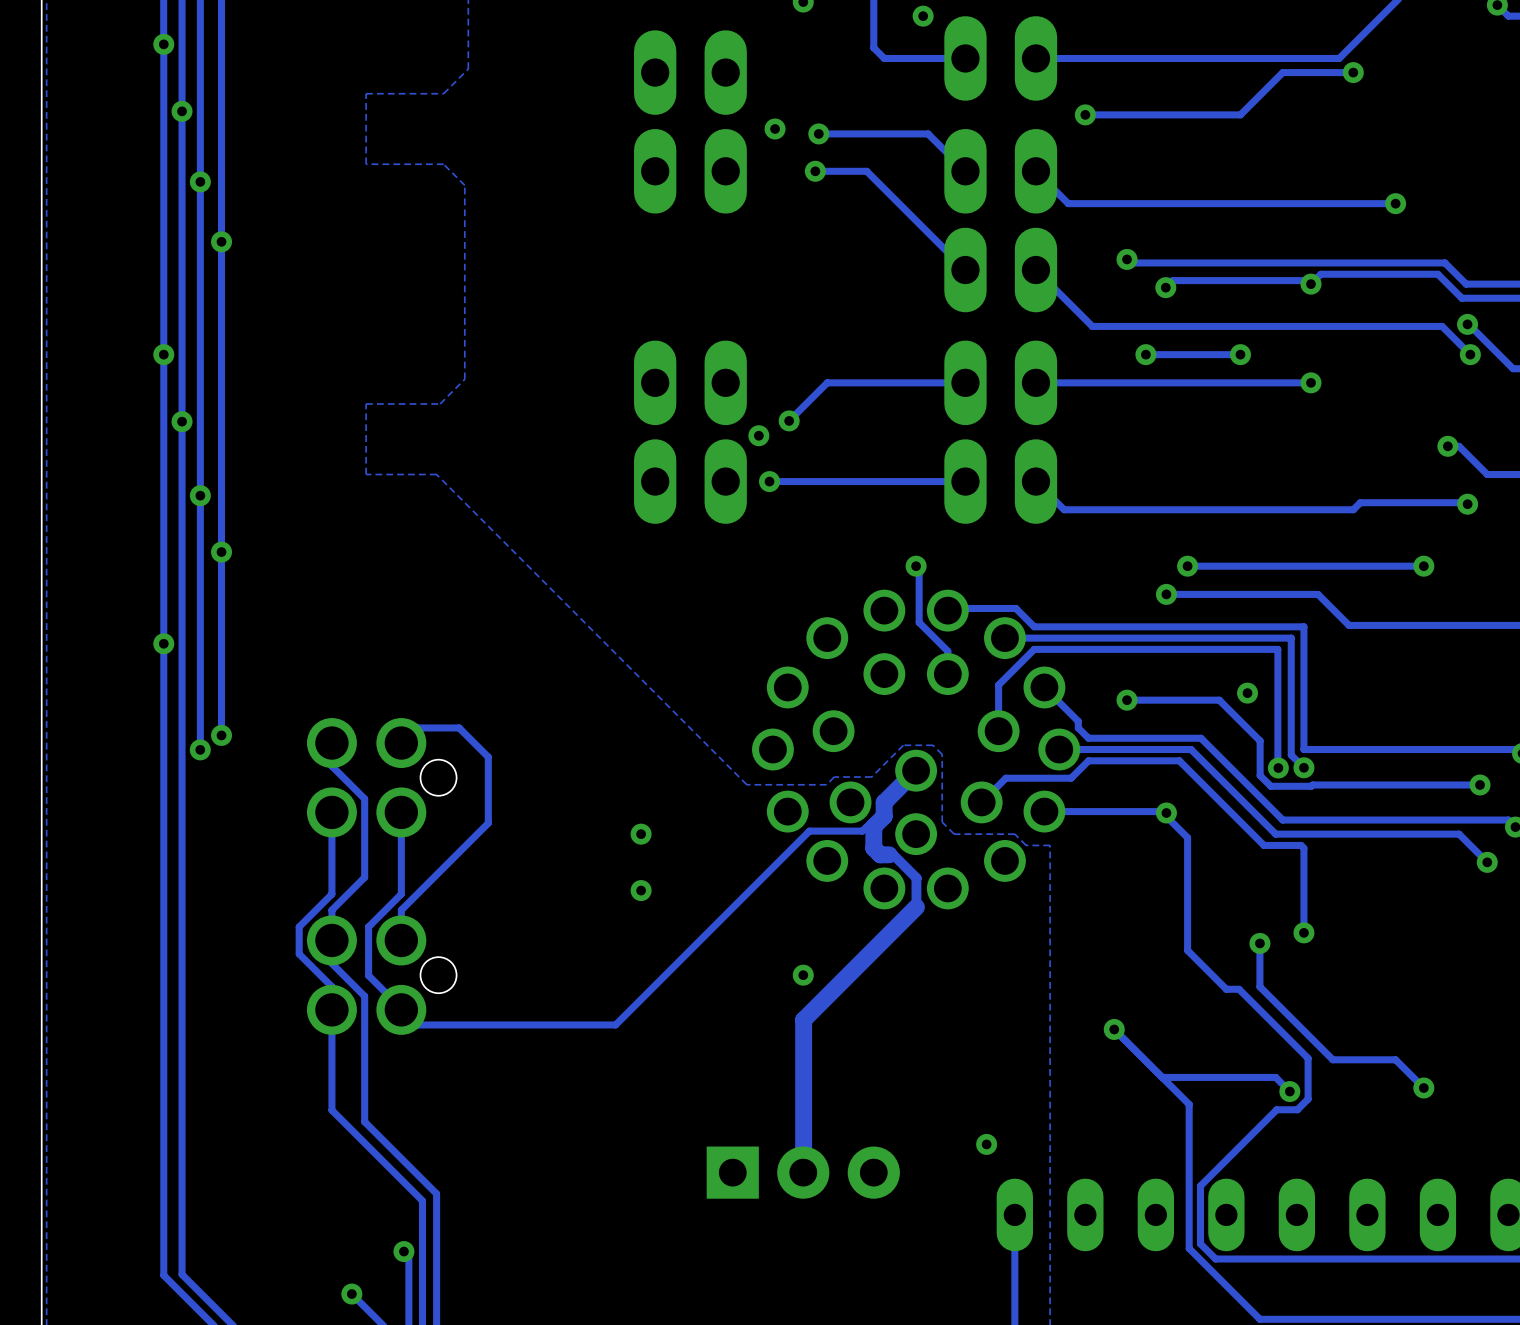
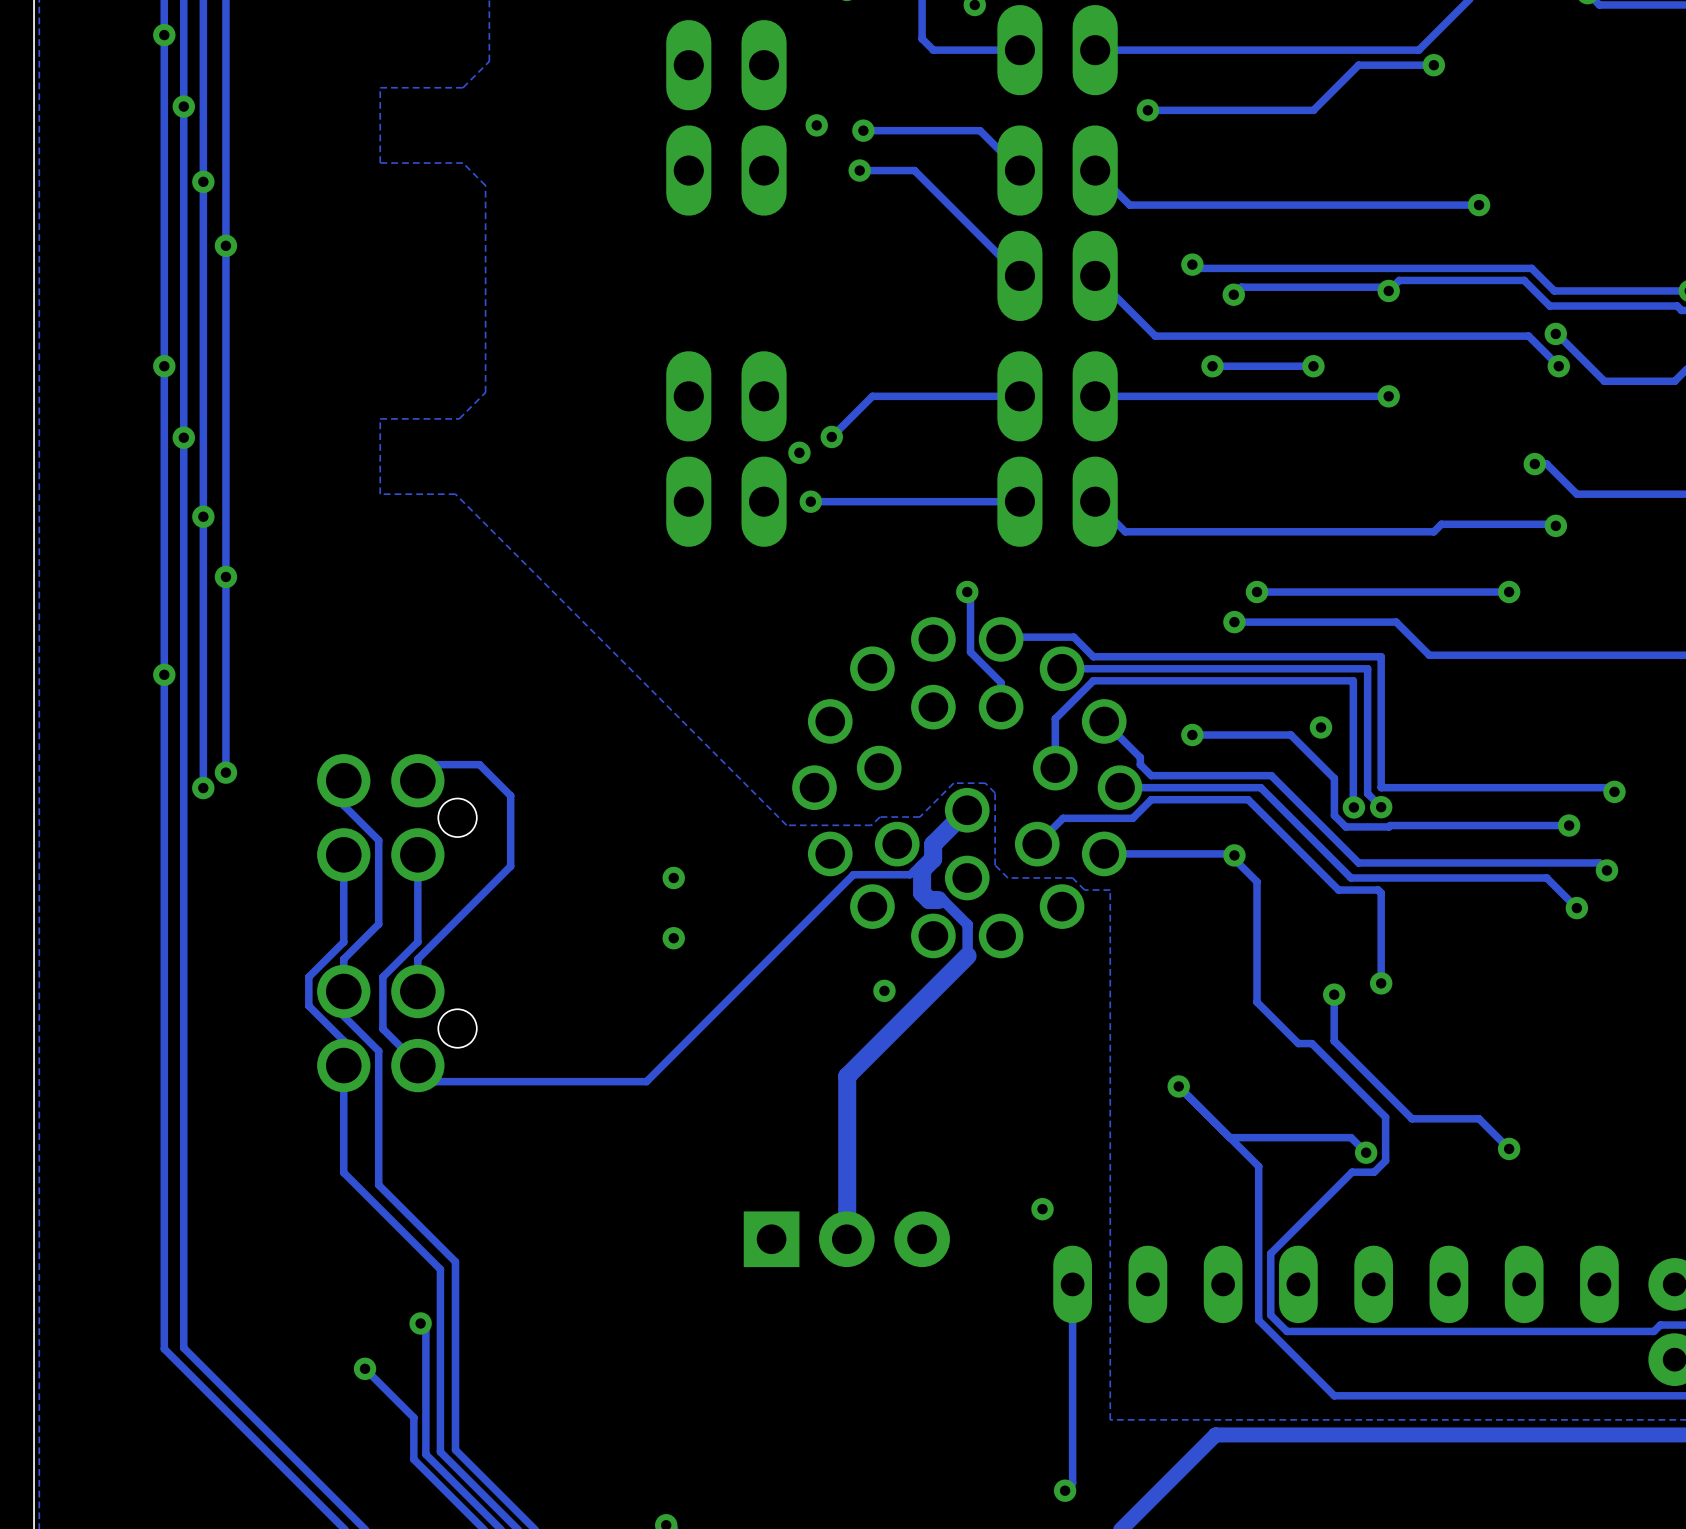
via position: (803, 975) -> (884, 990)

